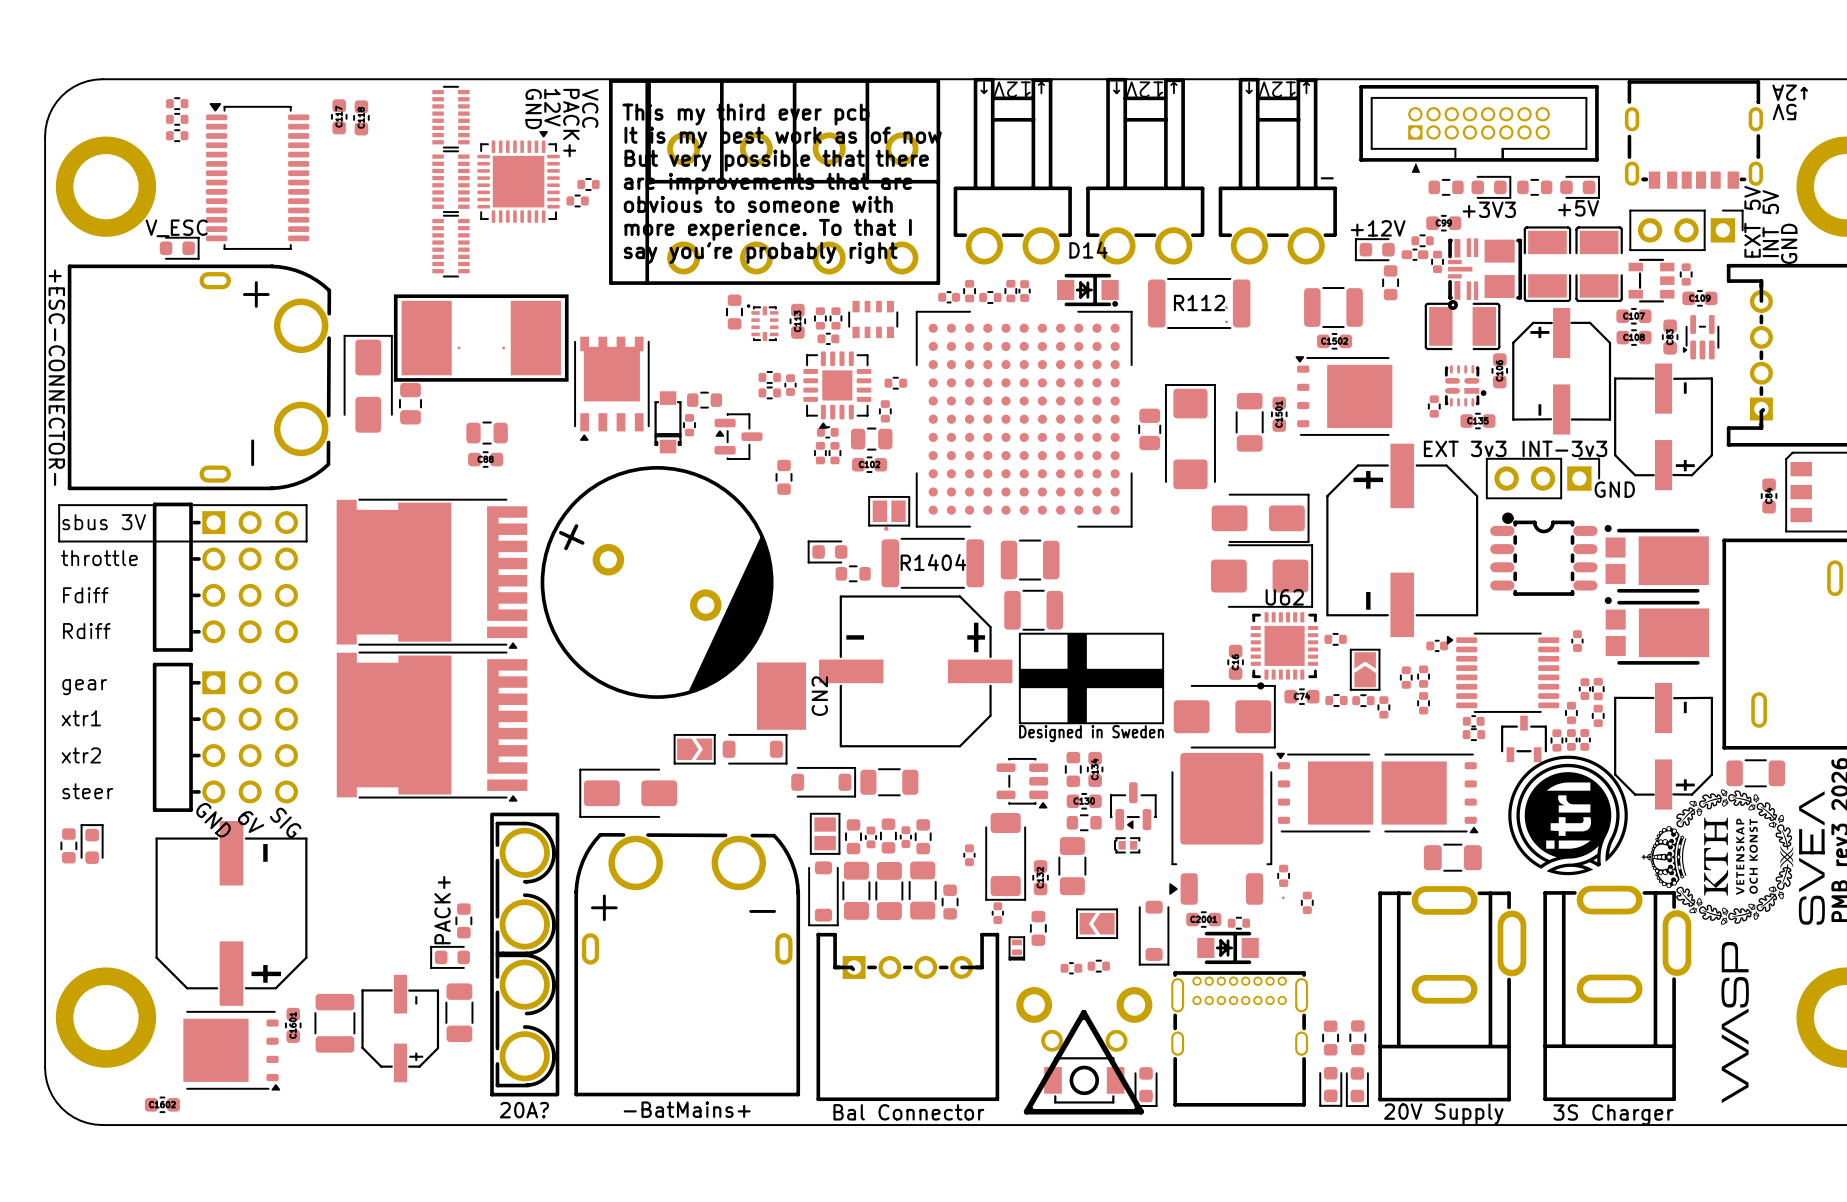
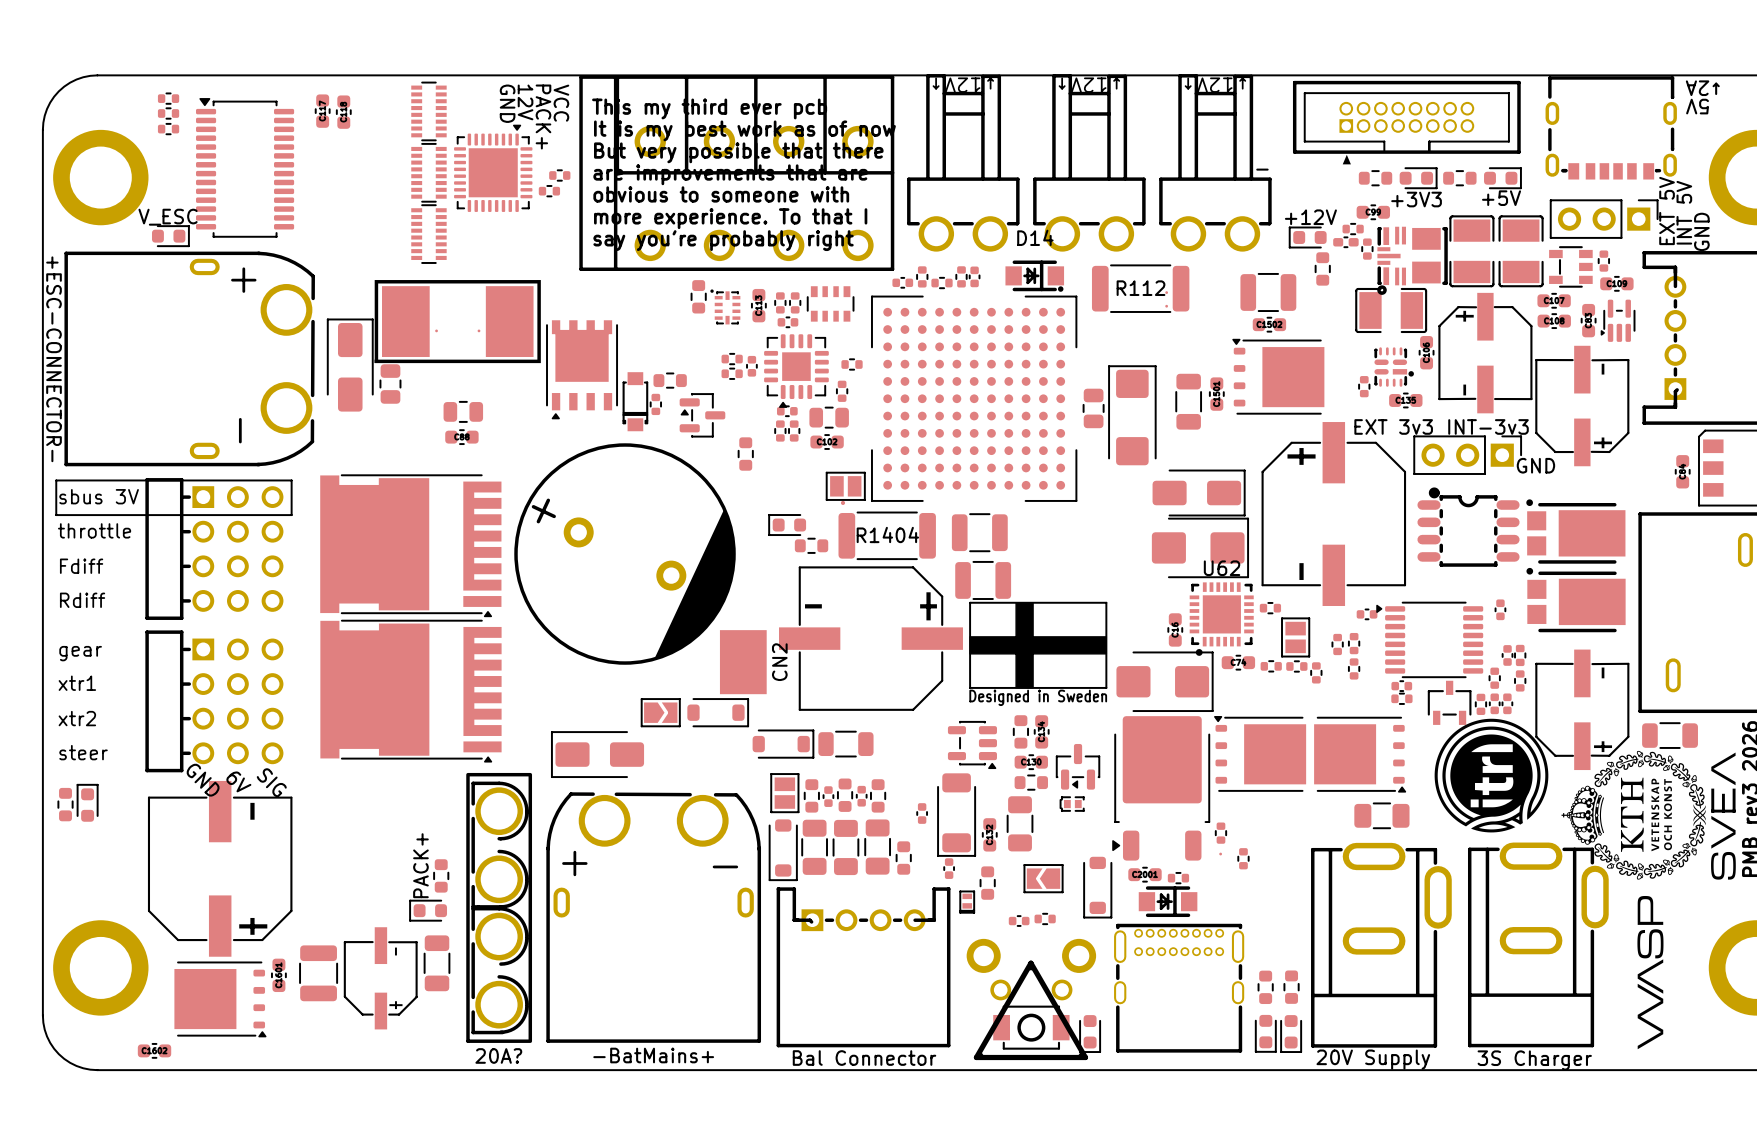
part footprint: [1349, 648, 1381, 691] -> [1281, 617, 1311, 658]

